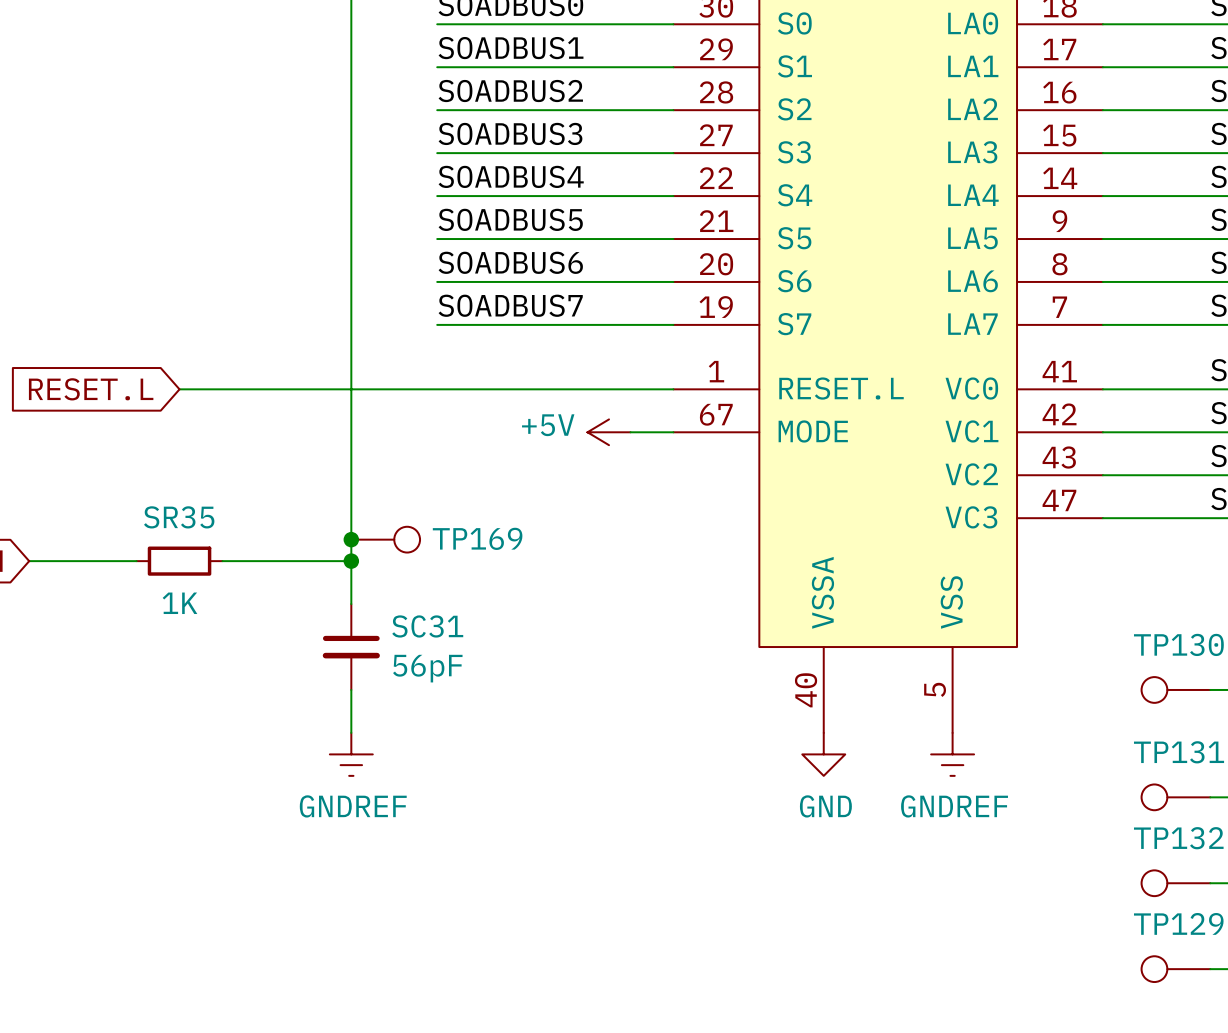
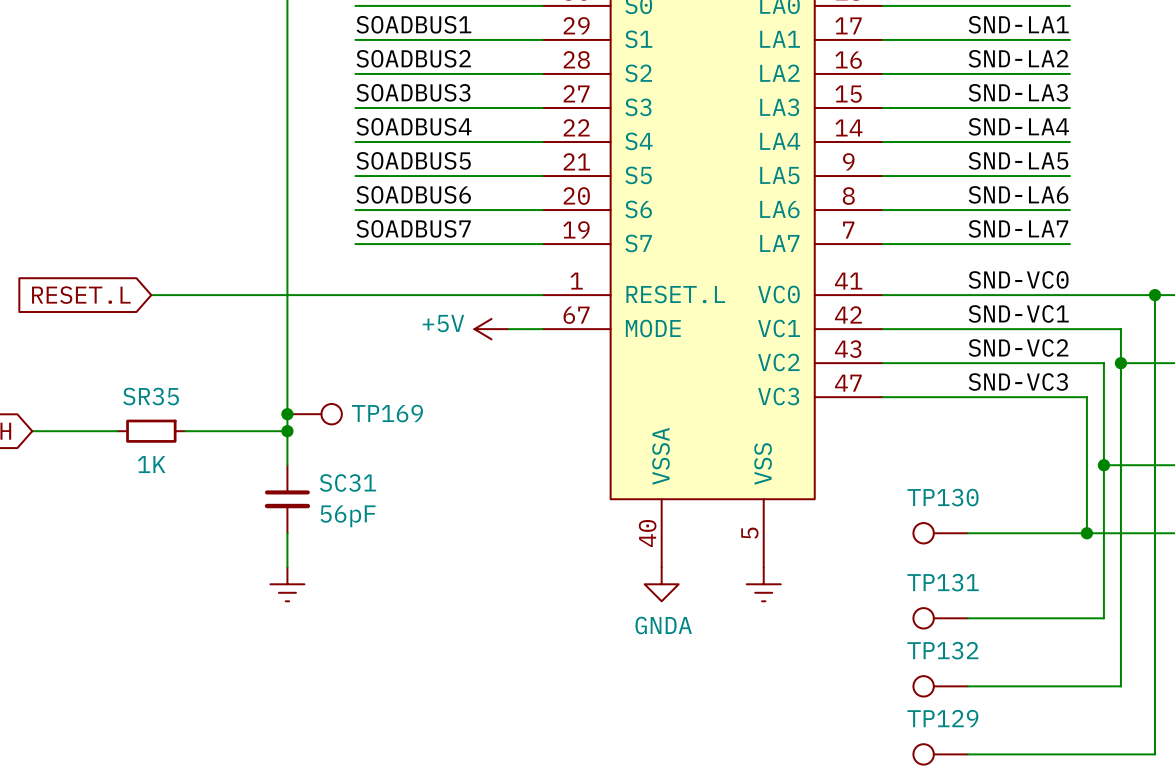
power symbol: GND (823, 754) -> GNDA (661, 584)
power symbol text: GNDREF (353, 806) -> none
power symbol text: GNDREF (954, 806) -> none

